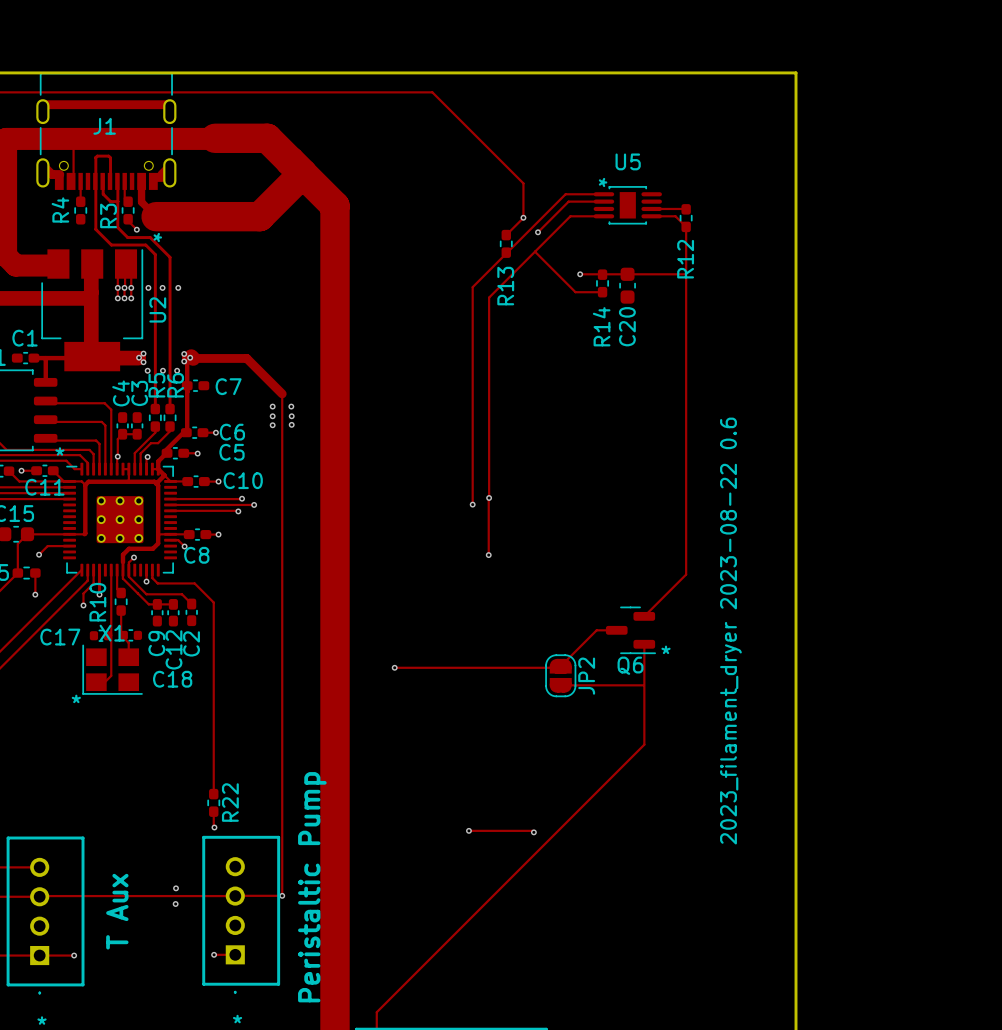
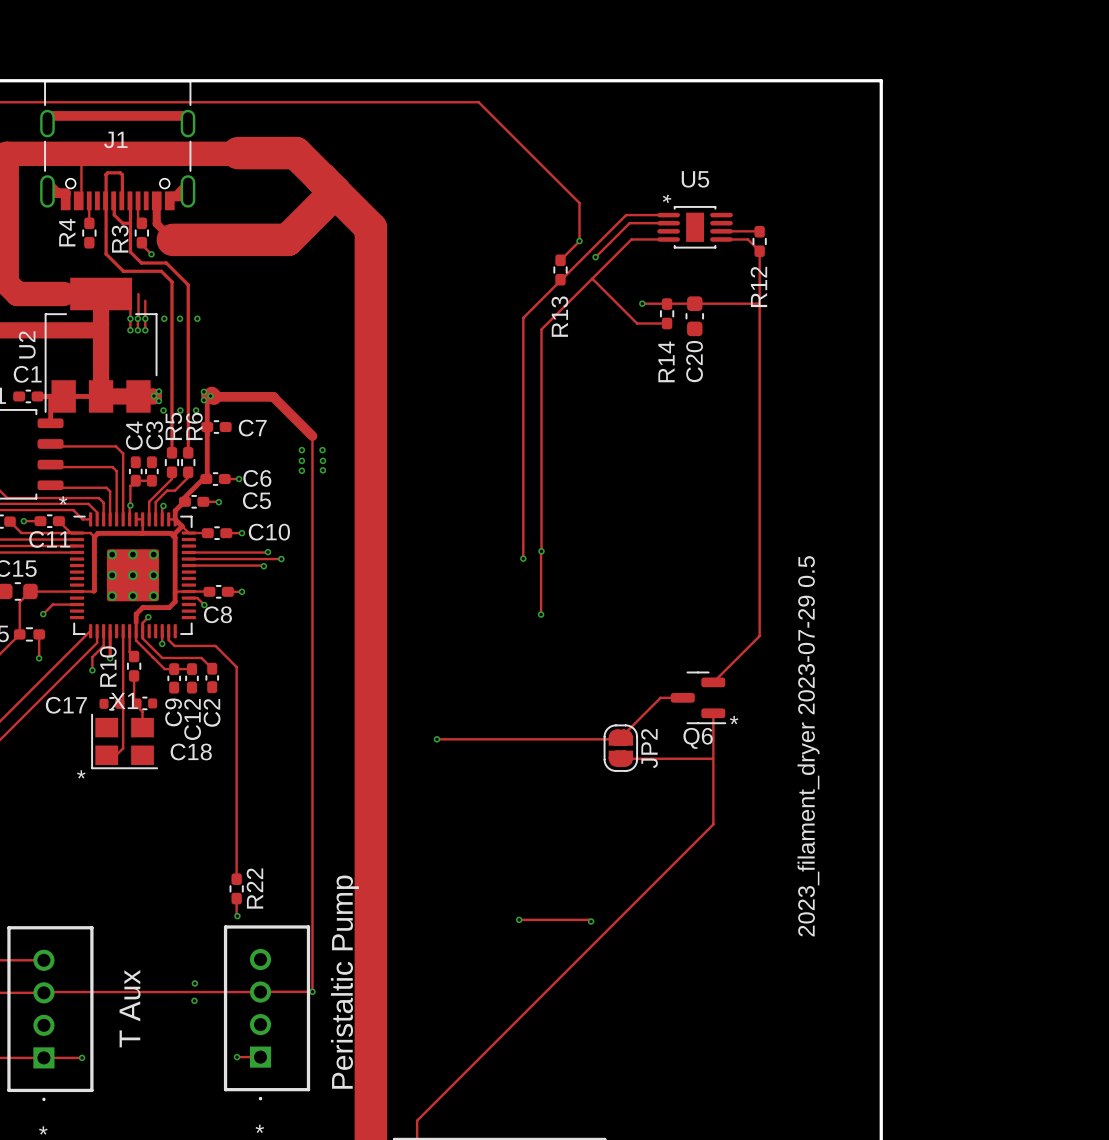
U2 footprint: [41, 249, 144, 372] -> [44, 277, 158, 413]
U2 name position: U2 (157, 309) -> U2 (27, 344)
text: 2023_filament_dryer 2023-08-22 0.6 (730, 631) -> 2023_filament_dryer 2023-07-29 0.5 (808, 746)

